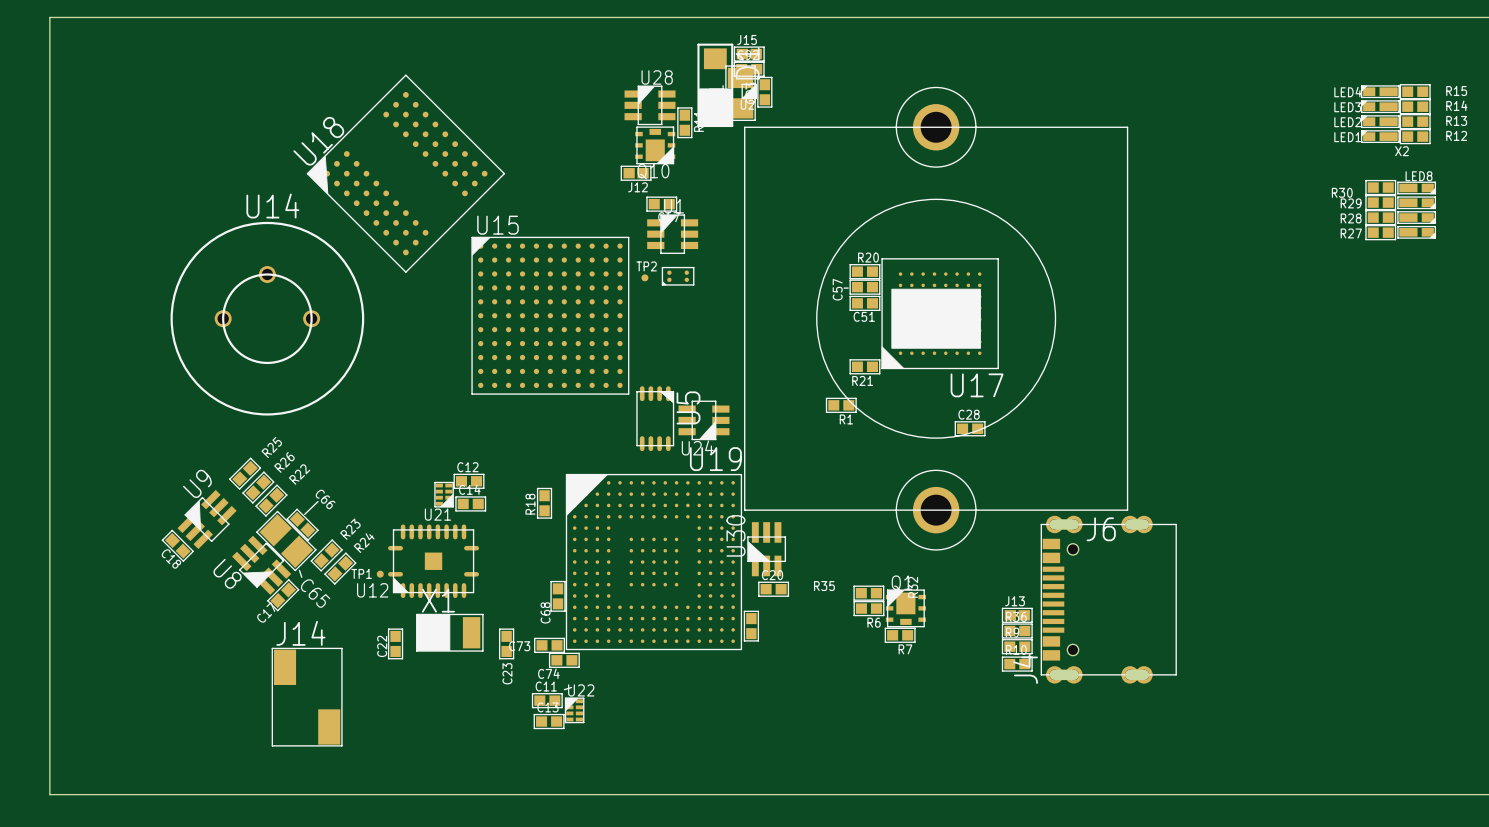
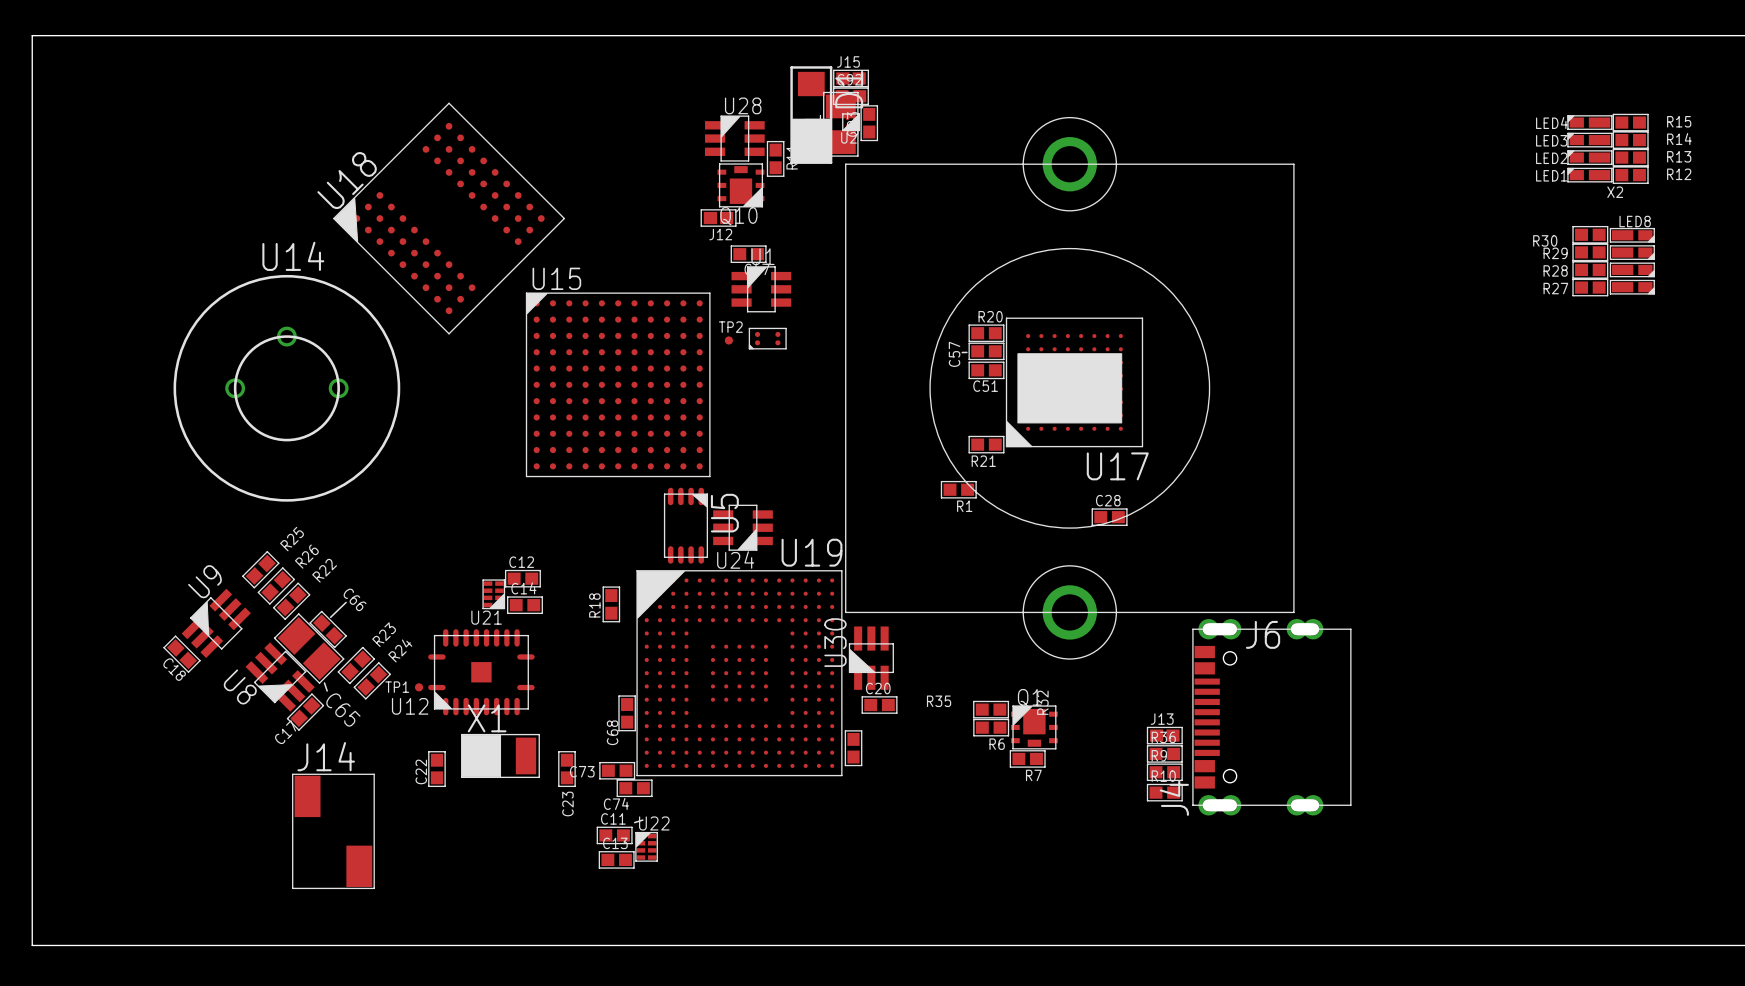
U5 position: (655, 418) -> (685, 525)
U24 position: (703, 420) -> (743, 527)

